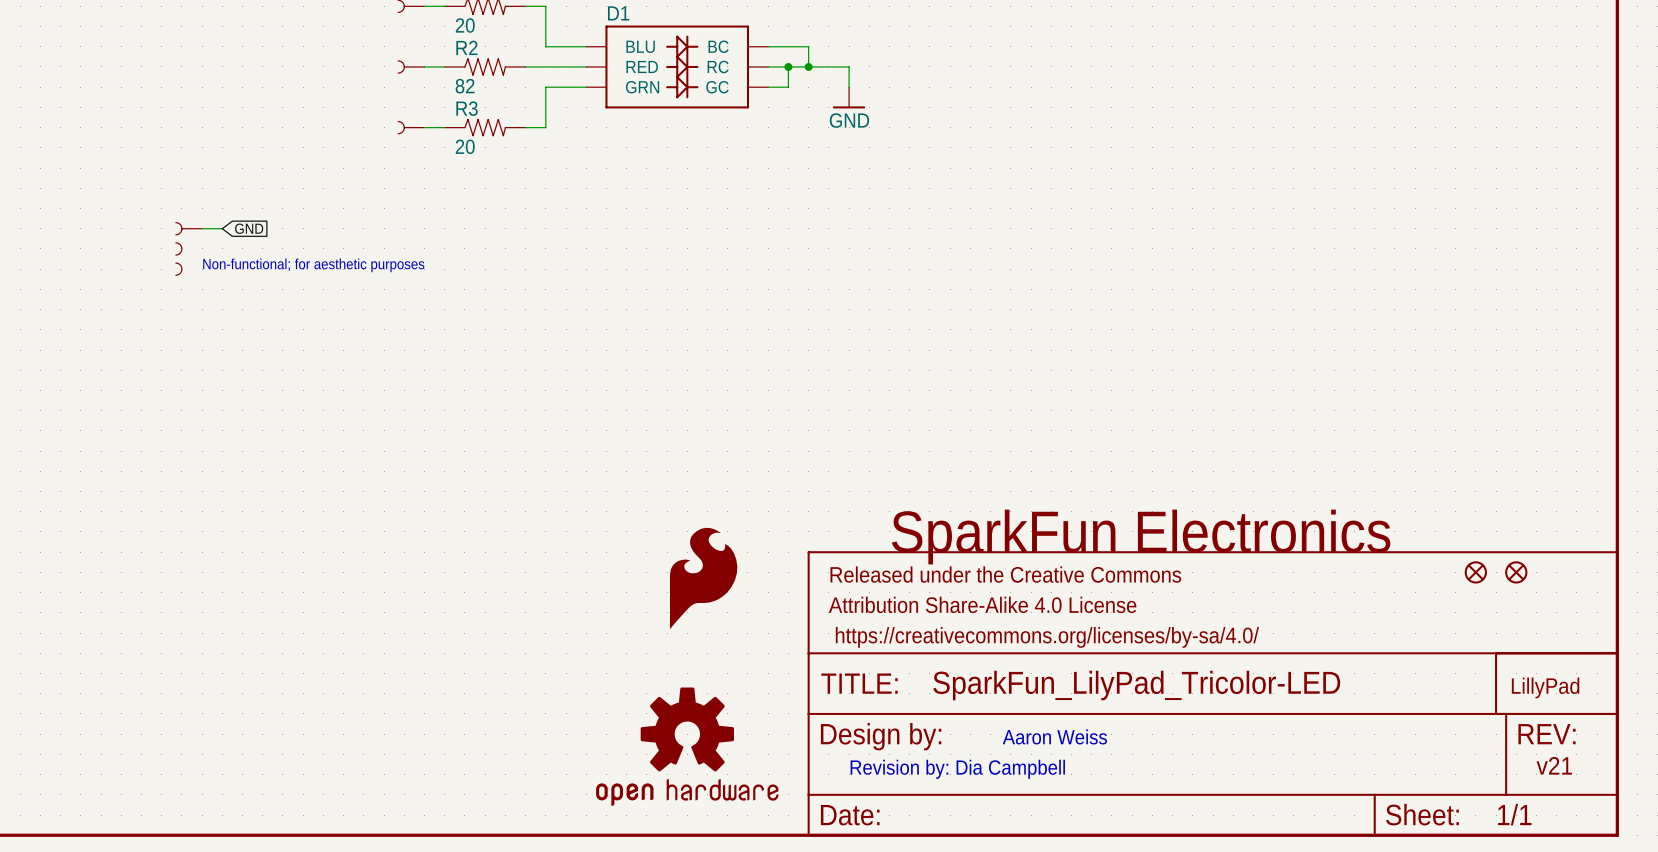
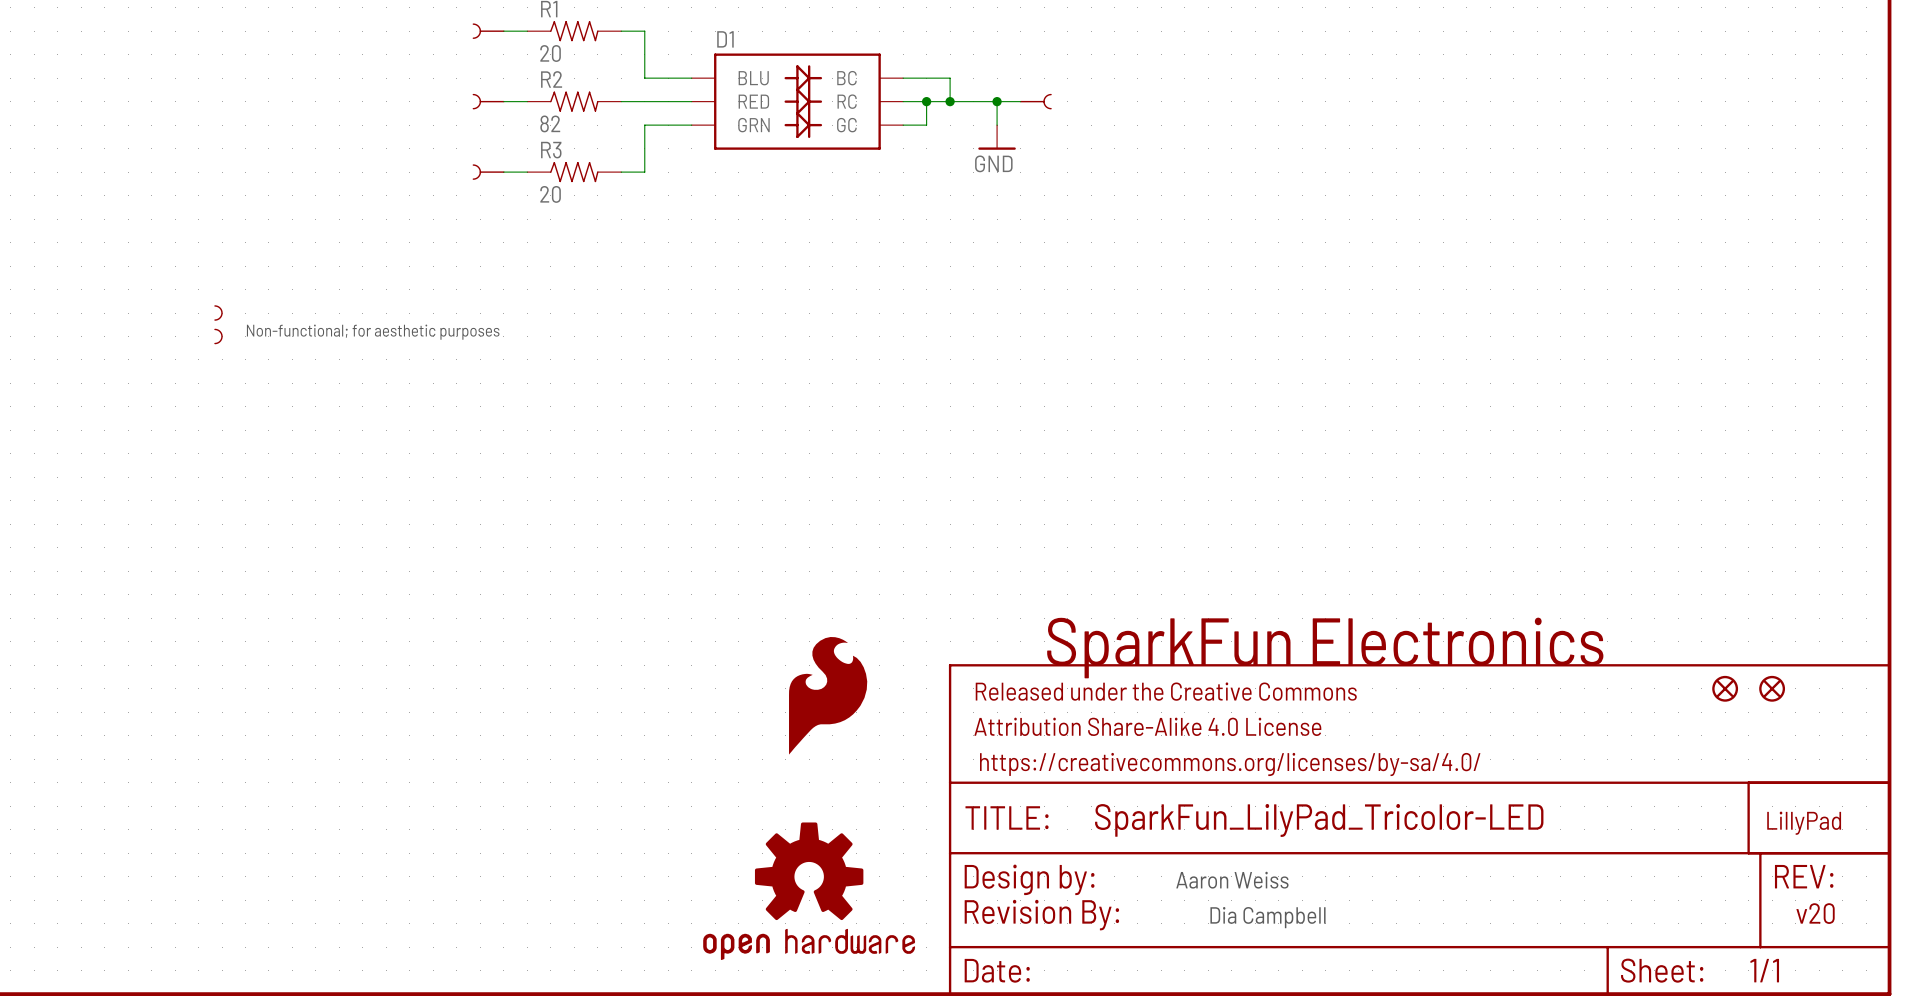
wire: none -> (997, 101) (1020, 101)
junction: none -> (997, 101)
part: none -> (1035, 101)
part: (188, 228) -> none
wire: (202, 228) (222, 228) -> none
global label: GND (249, 228) -> none
text: v21 (1554, 765) -> v20 (1815, 913)
part: none -> (1041, 915)
text: Revision by: Dia Campbell (957, 769) -> Dia Campbell (1267, 917)

